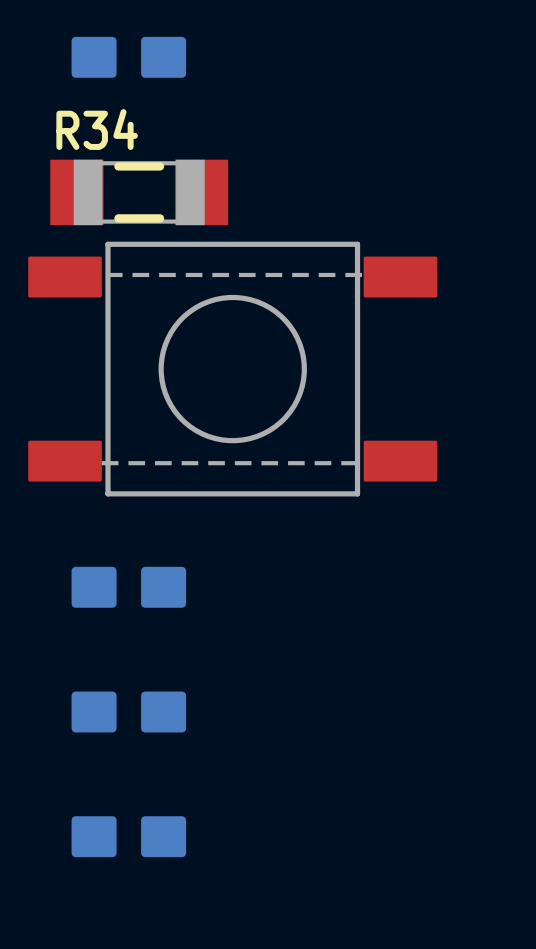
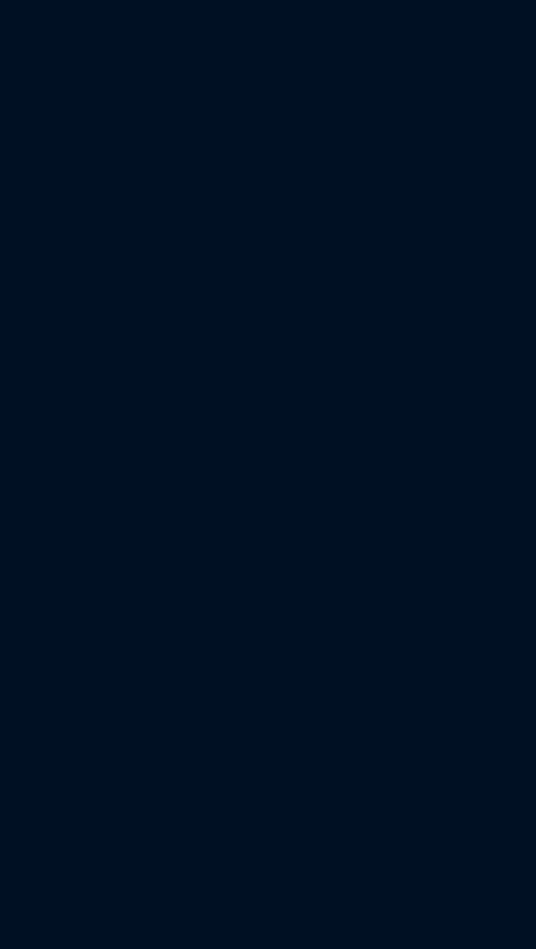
part: (128, 57) -> none
R34: (139, 192) -> none
part: (232, 369) -> none
part: (128, 587) -> none
part: (128, 711) -> none
part: (128, 836) -> none

